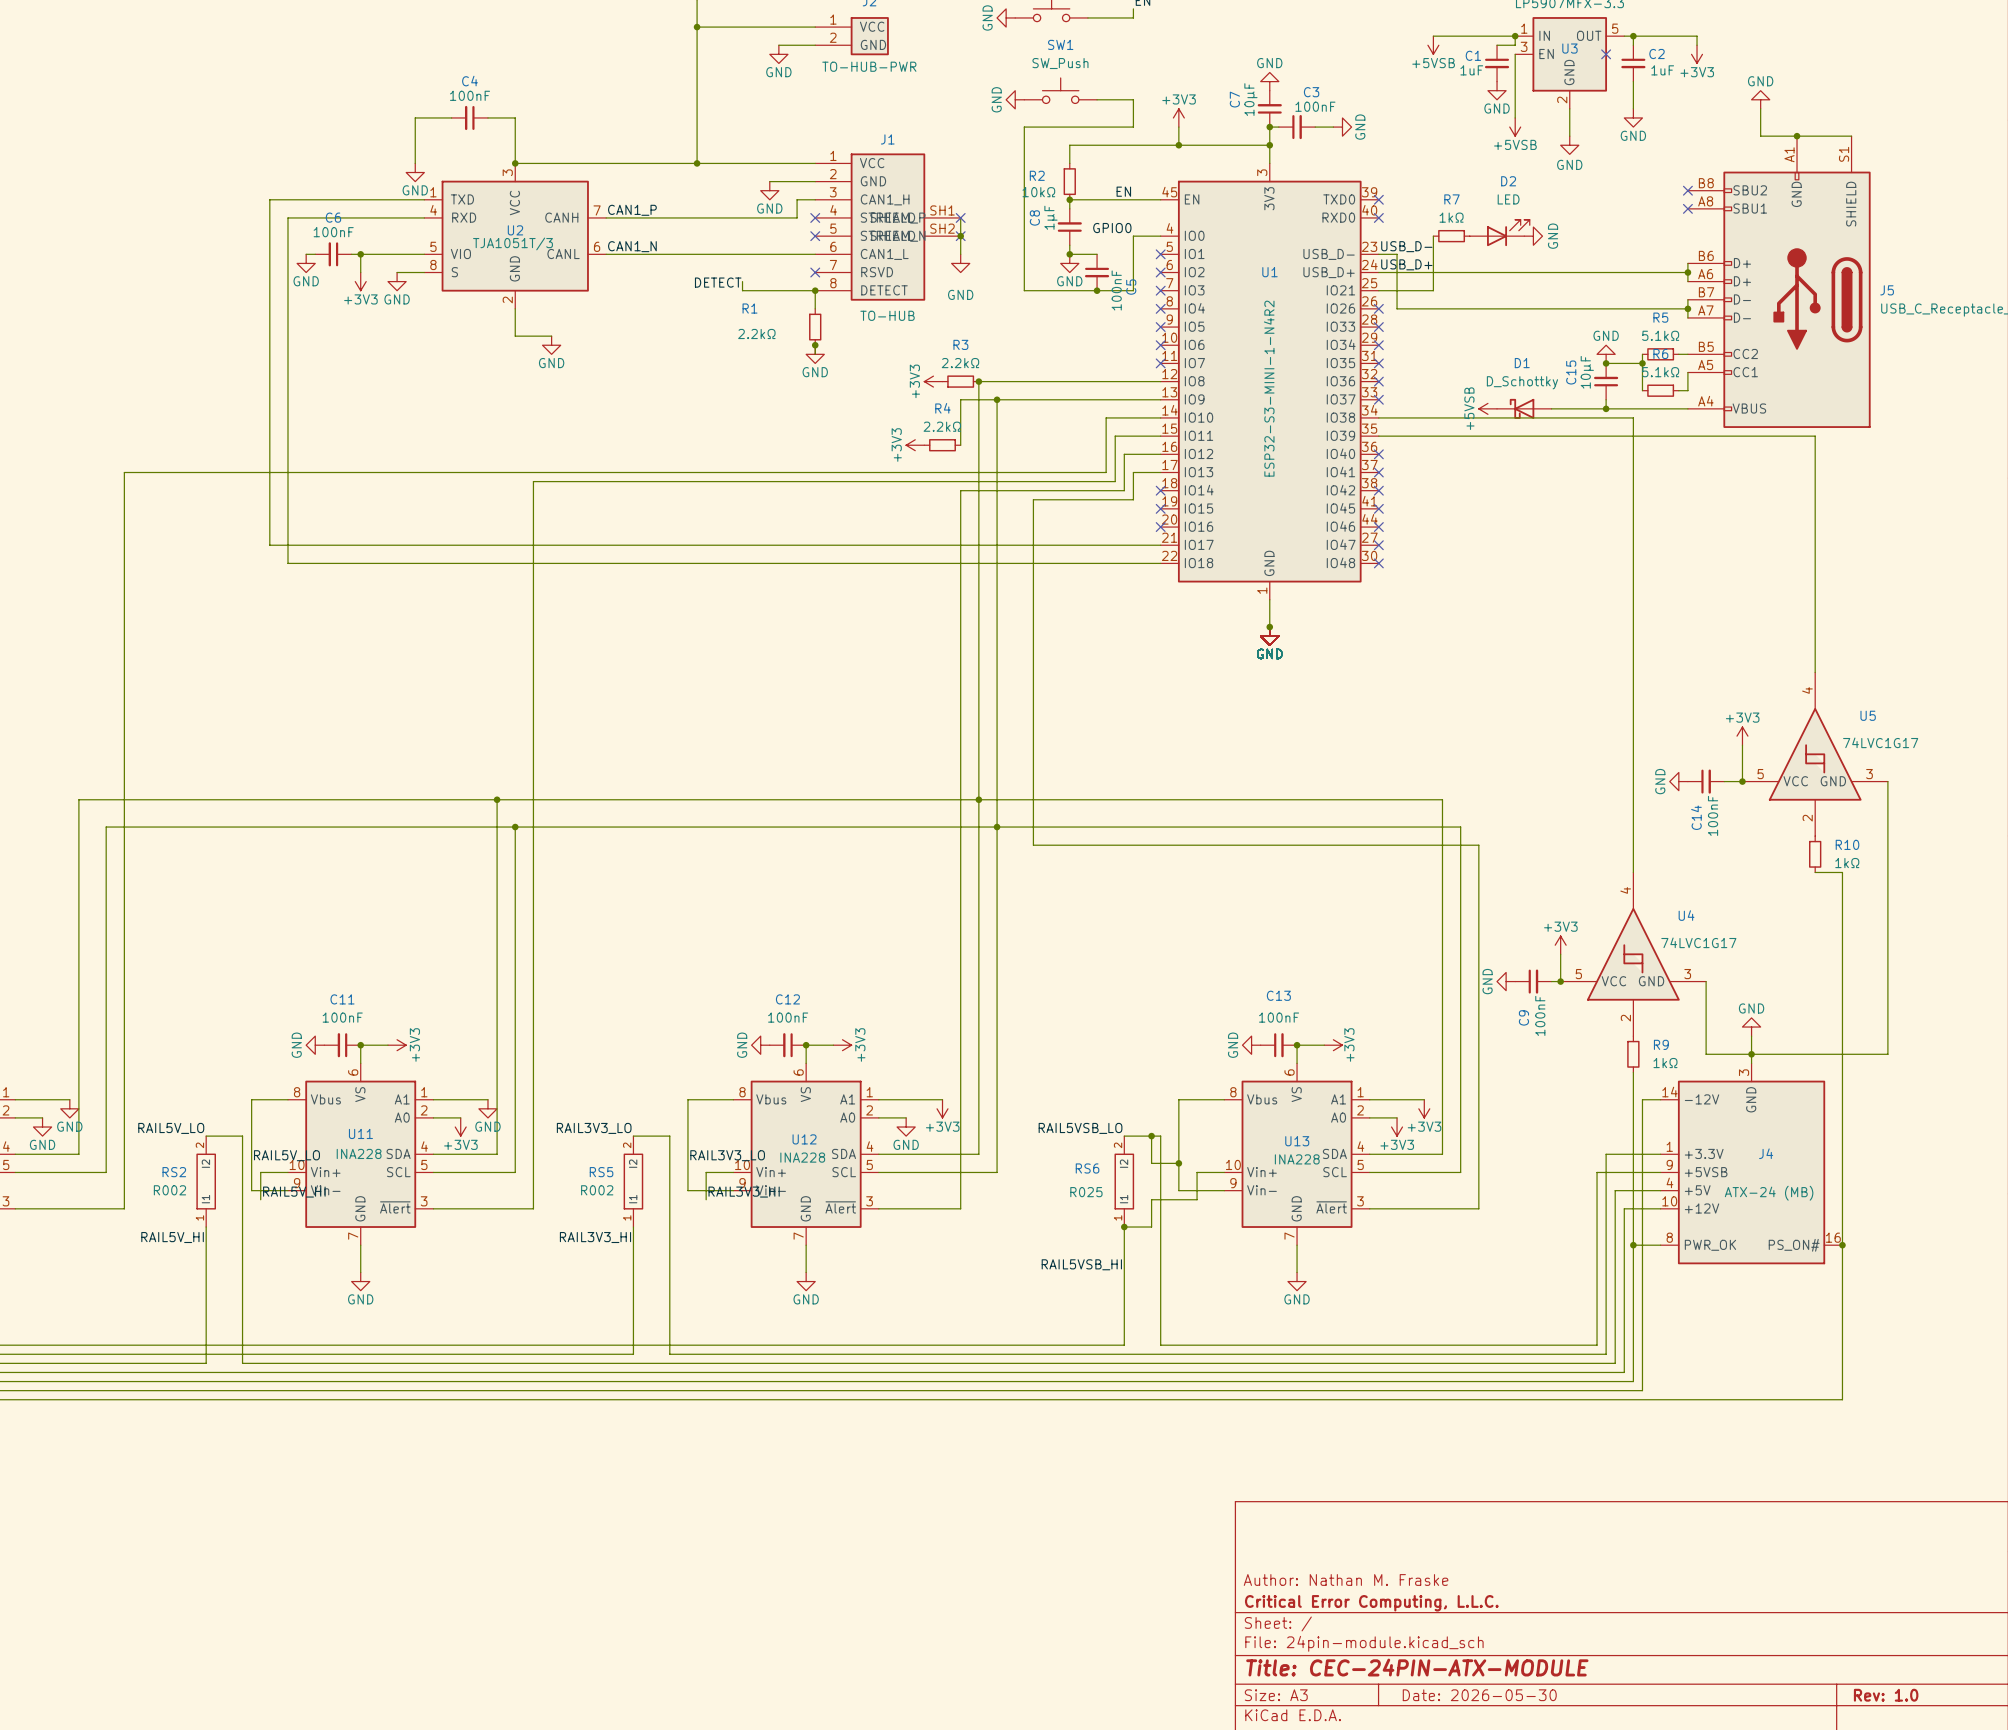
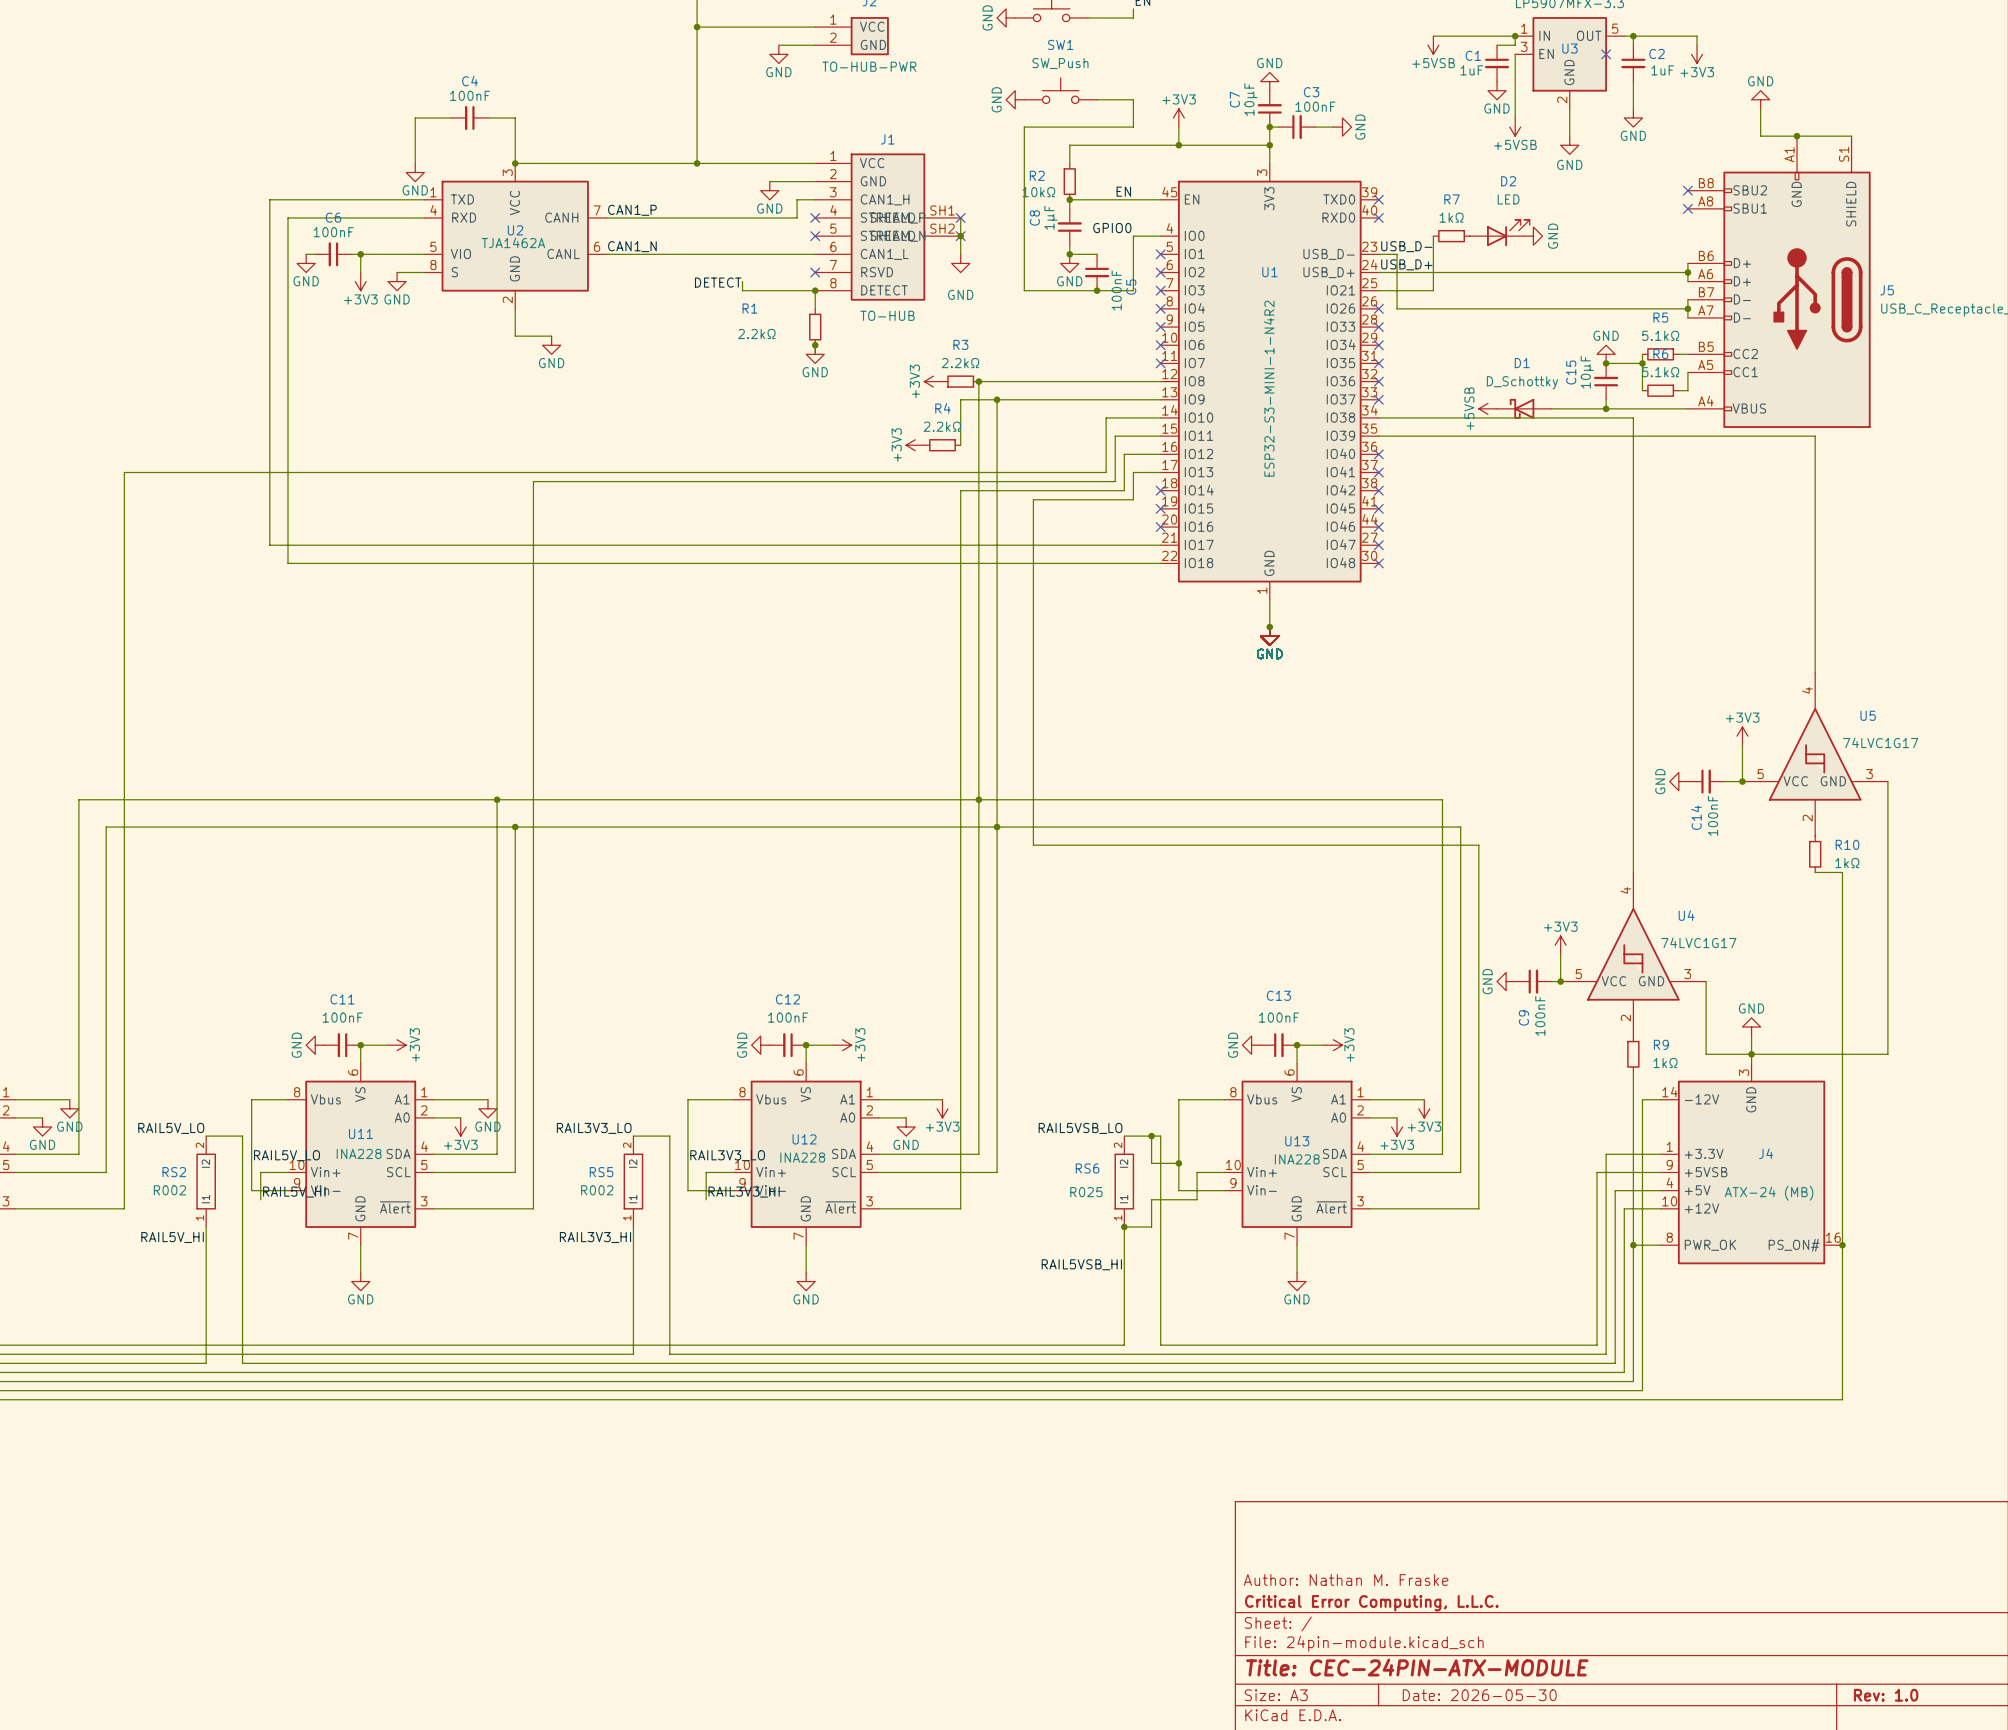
U2 value: TJA1051T/3 (513, 243) -> TJA1462A (513, 242)

